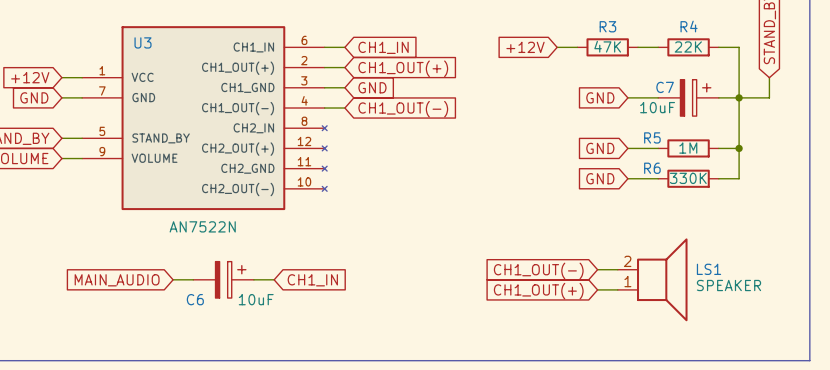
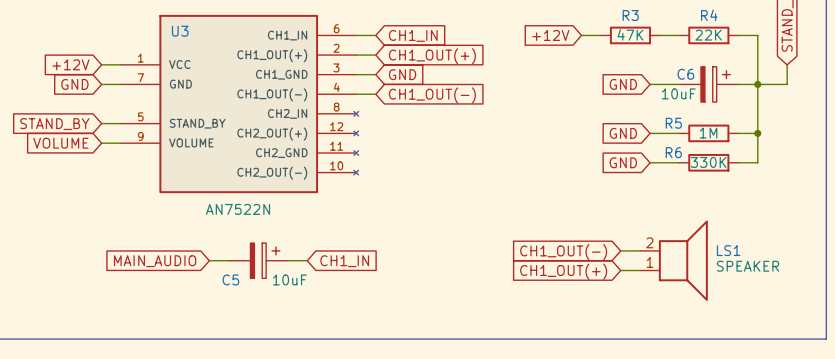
C7 name: C7 (665, 87) -> C6 (685, 74)
C6 name: C6 (195, 299) -> C5 (230, 279)

